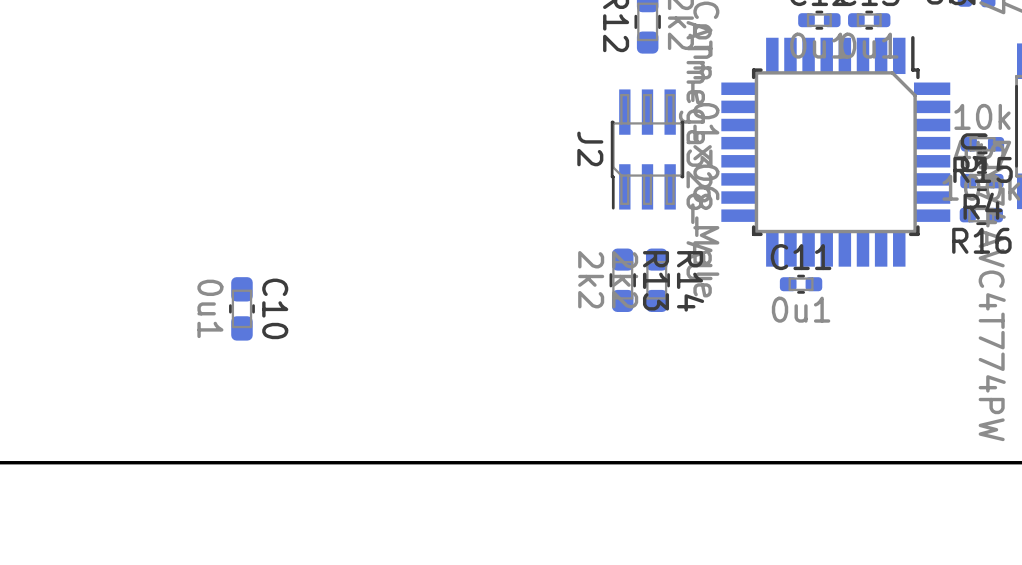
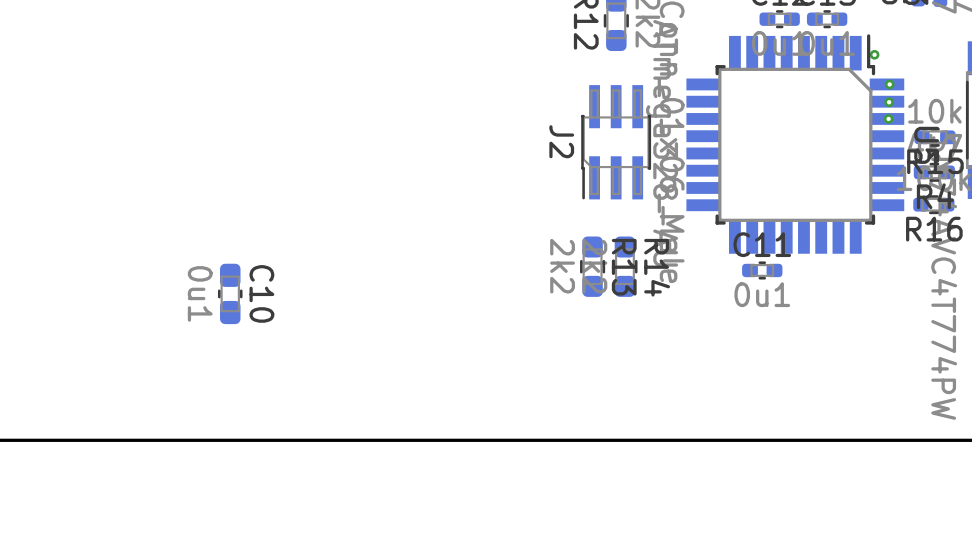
via: none -> (874, 54)
via: none -> (889, 84)
via: none -> (889, 102)
via: none -> (888, 118)

